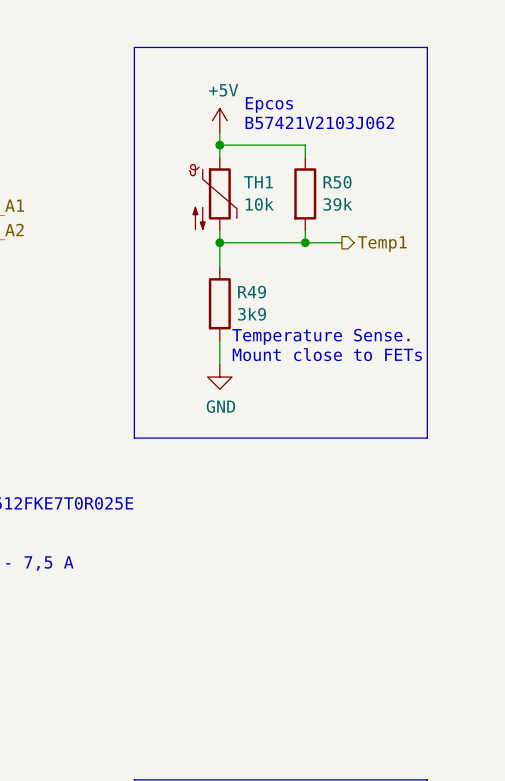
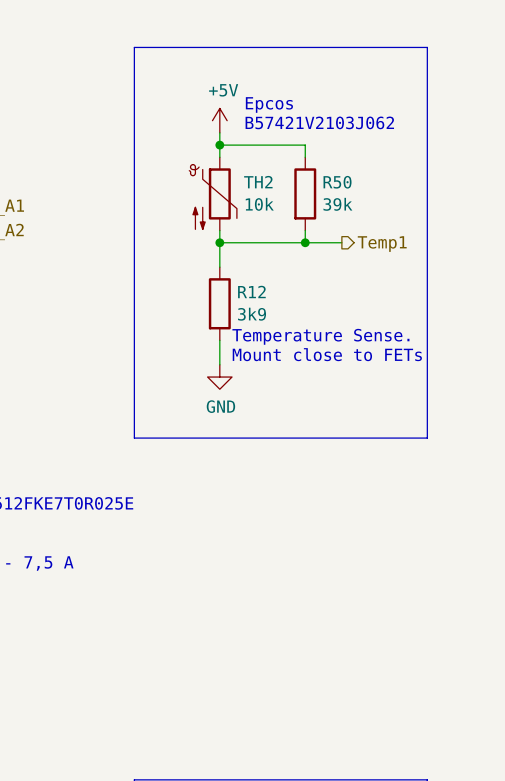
TH1 name: TH1 (258, 182) -> TH2 (258, 182)
R49 name: R49 (252, 292) -> R12 (251, 292)

